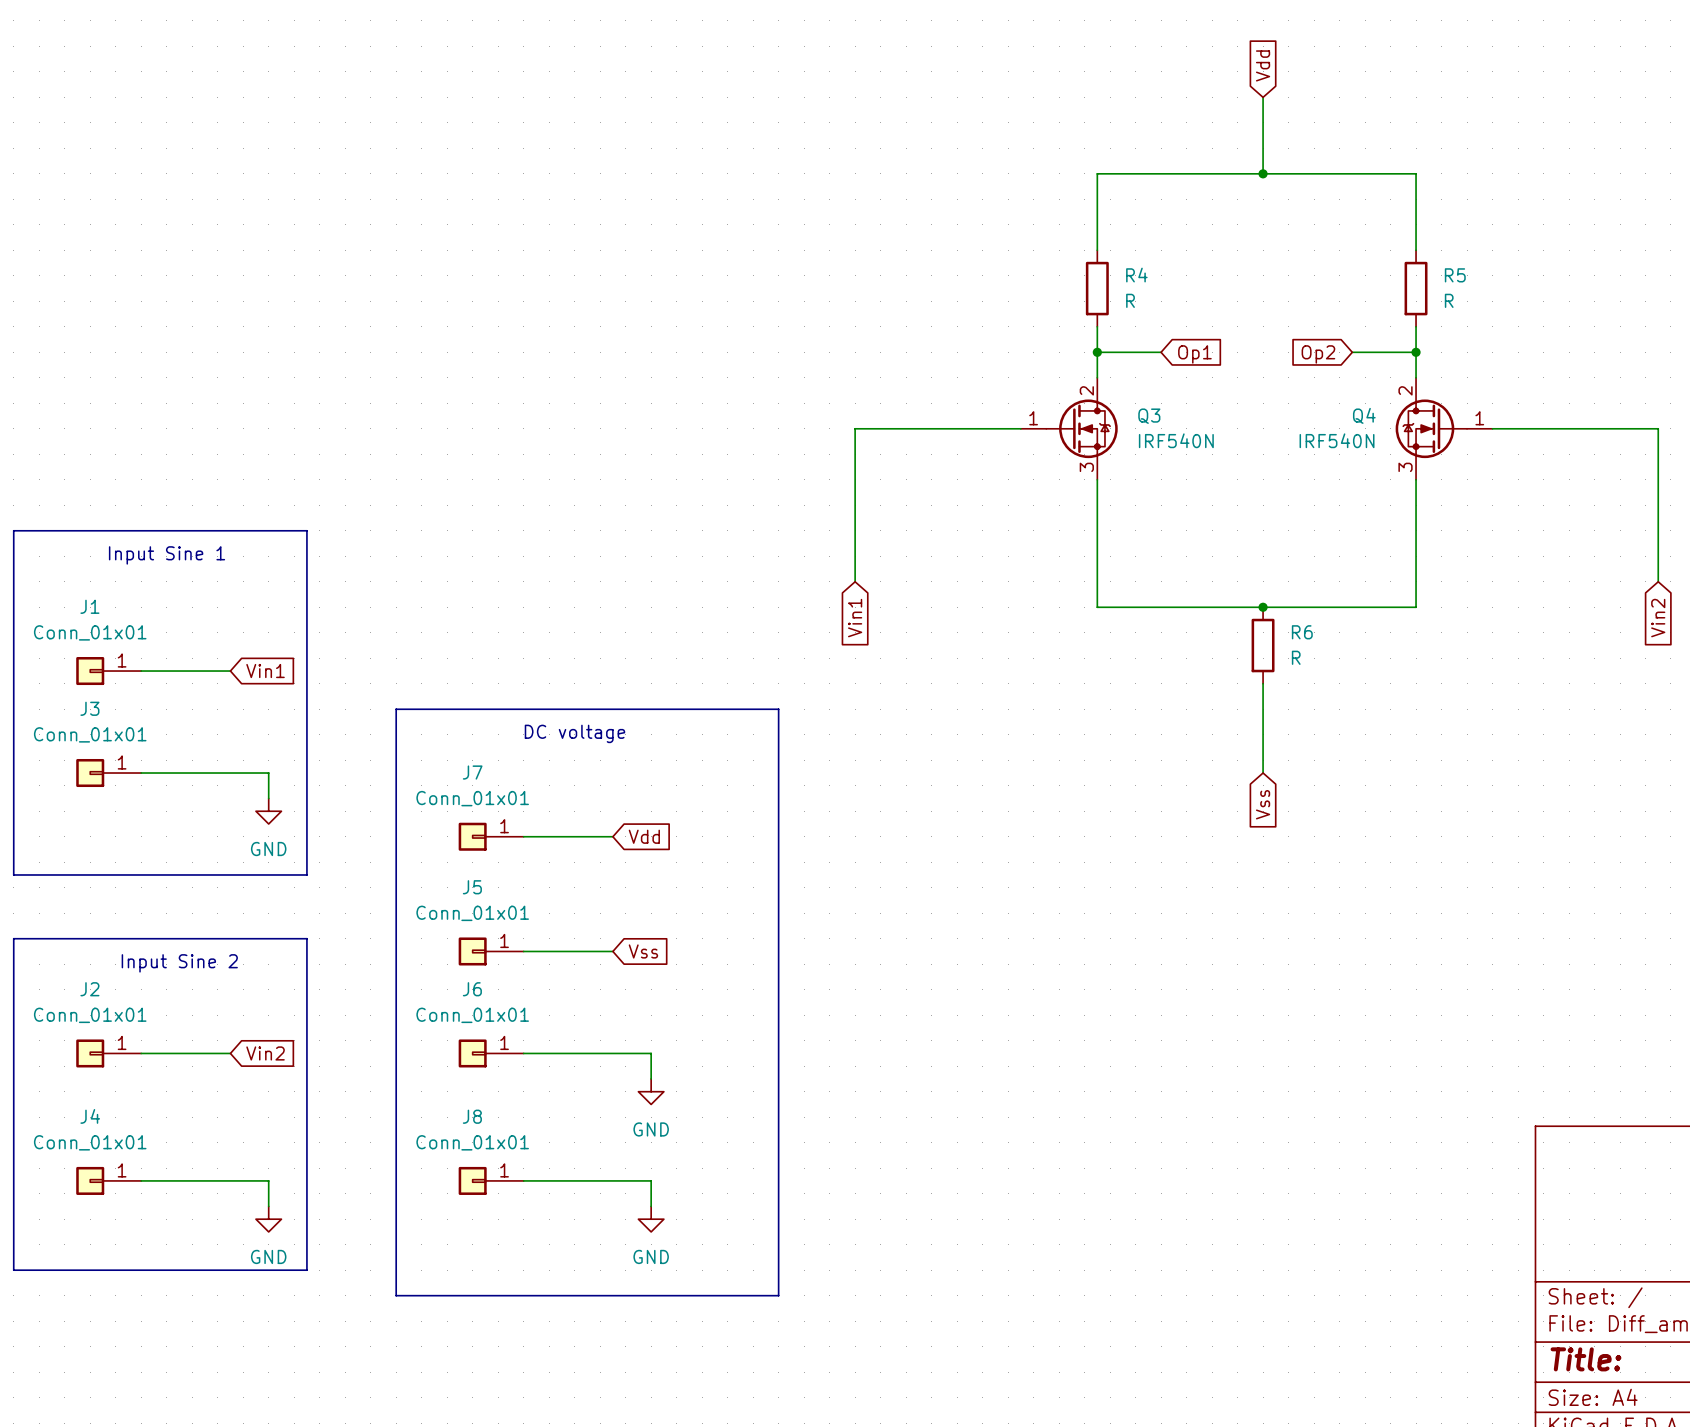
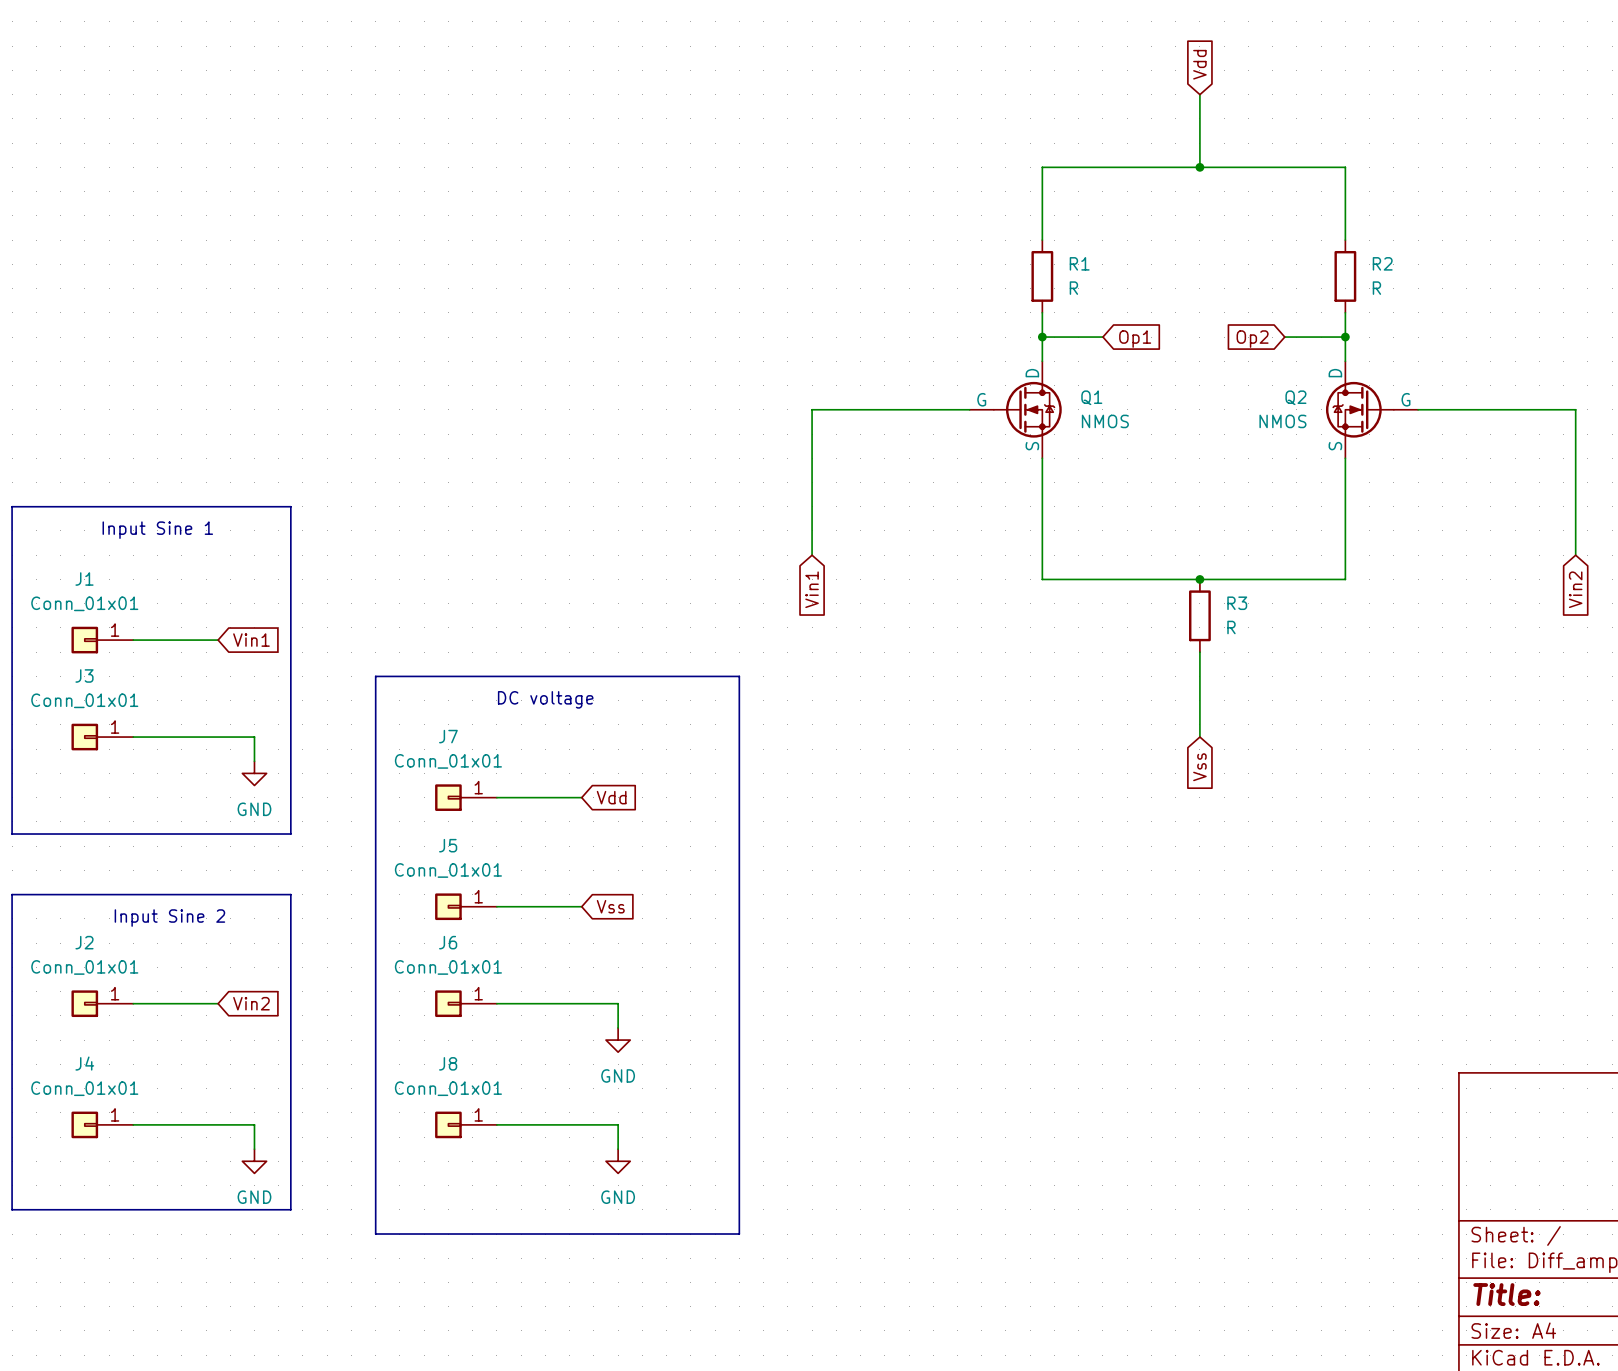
R4 name: R4 (1136, 275) -> R1 (1079, 263)
R5 name: R5 (1455, 275) -> R2 (1382, 263)
Q3 pin name: none -> D (1032, 373)
Q3 pin number: 2 (1086, 390) -> none
Q4 pin name: none -> D (1335, 373)
Q4 pin number: 2 (1405, 390) -> none
Q4 name: Q4 (1364, 415) -> Q2 (1295, 397)
Q3 name: Q3 (1149, 416) -> Q1 (1091, 397)
Q3 pin name: none -> G (981, 399)
Q3 pin number: 1 (1033, 418) -> none
Q4 pin name: none -> G (1405, 399)
Q4 pin number: 1 (1479, 418) -> none
Q3 value: IRF540N (1176, 440) -> NMOS (1105, 421)
Q4 value: IRF540N (1337, 440) -> NMOS (1282, 421)
Q3 pin name: none -> S (1032, 446)
Q3 pin number: 3 (1086, 467) -> none
Q4 pin name: none -> S (1335, 446)
Q4 pin number: 3 (1405, 467) -> none
R6 name: R6 (1302, 632) -> R3 (1237, 603)

